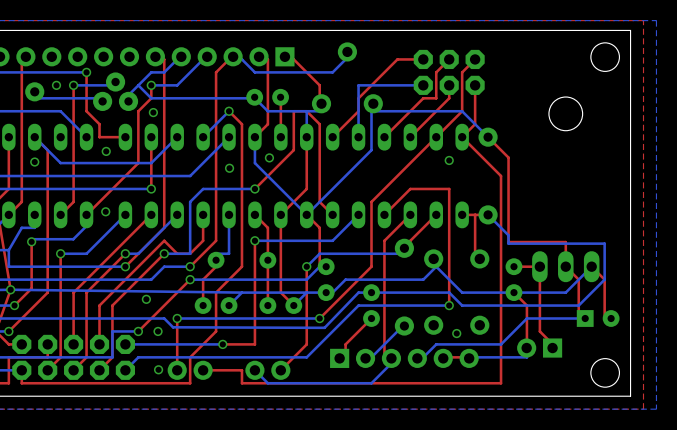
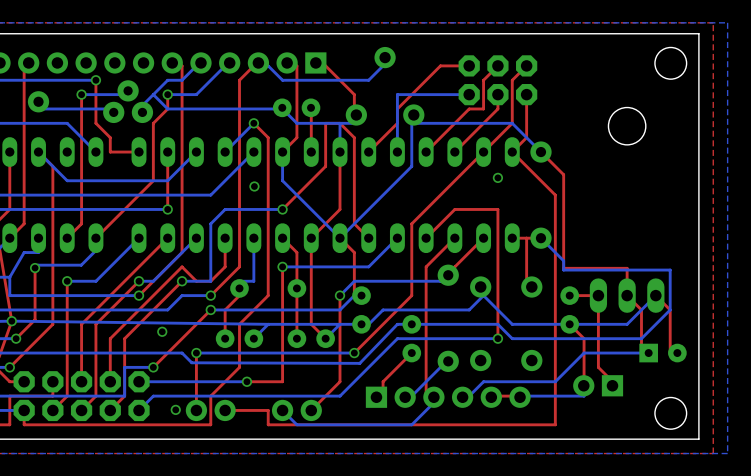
via: (56, 85) -> none
via: (153, 112) -> none
via: (106, 151) -> none
via: (269, 157) -> none
via: (34, 162) -> none
via: (105, 211) -> none
via: (158, 331) -> none
via: (456, 333) -> none

